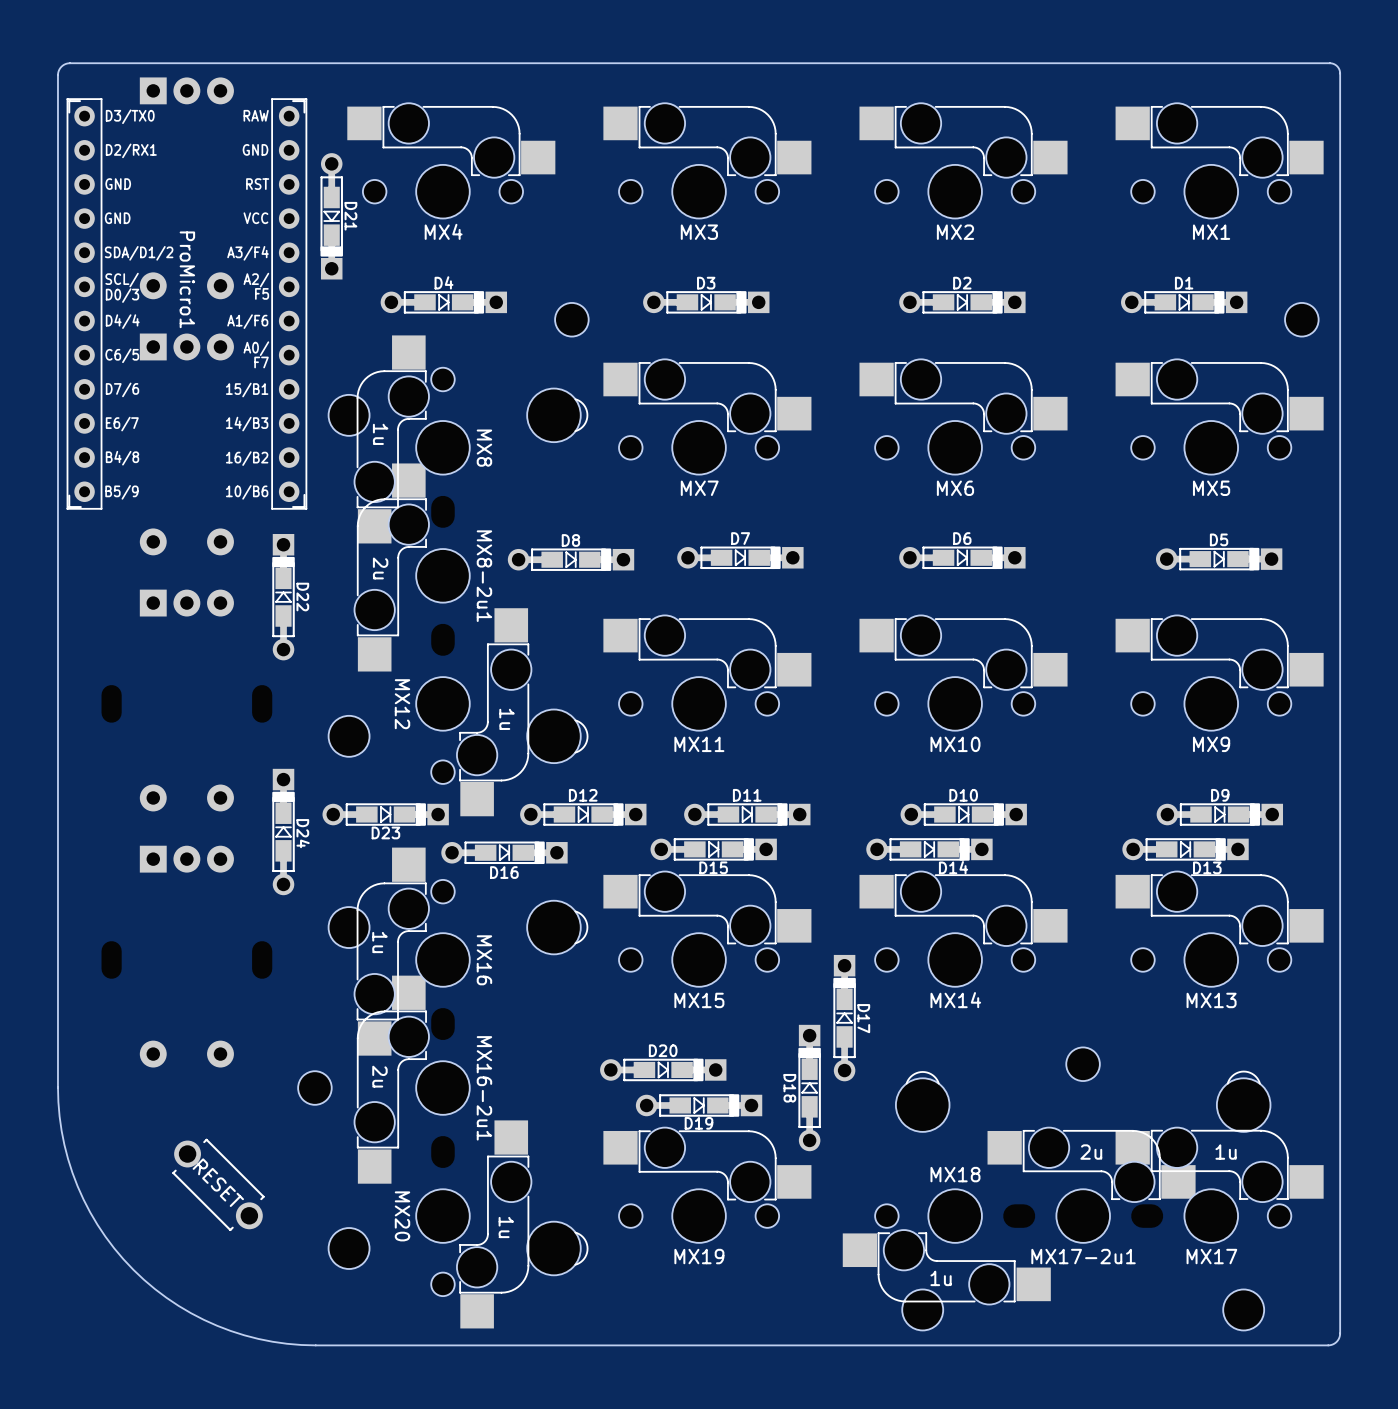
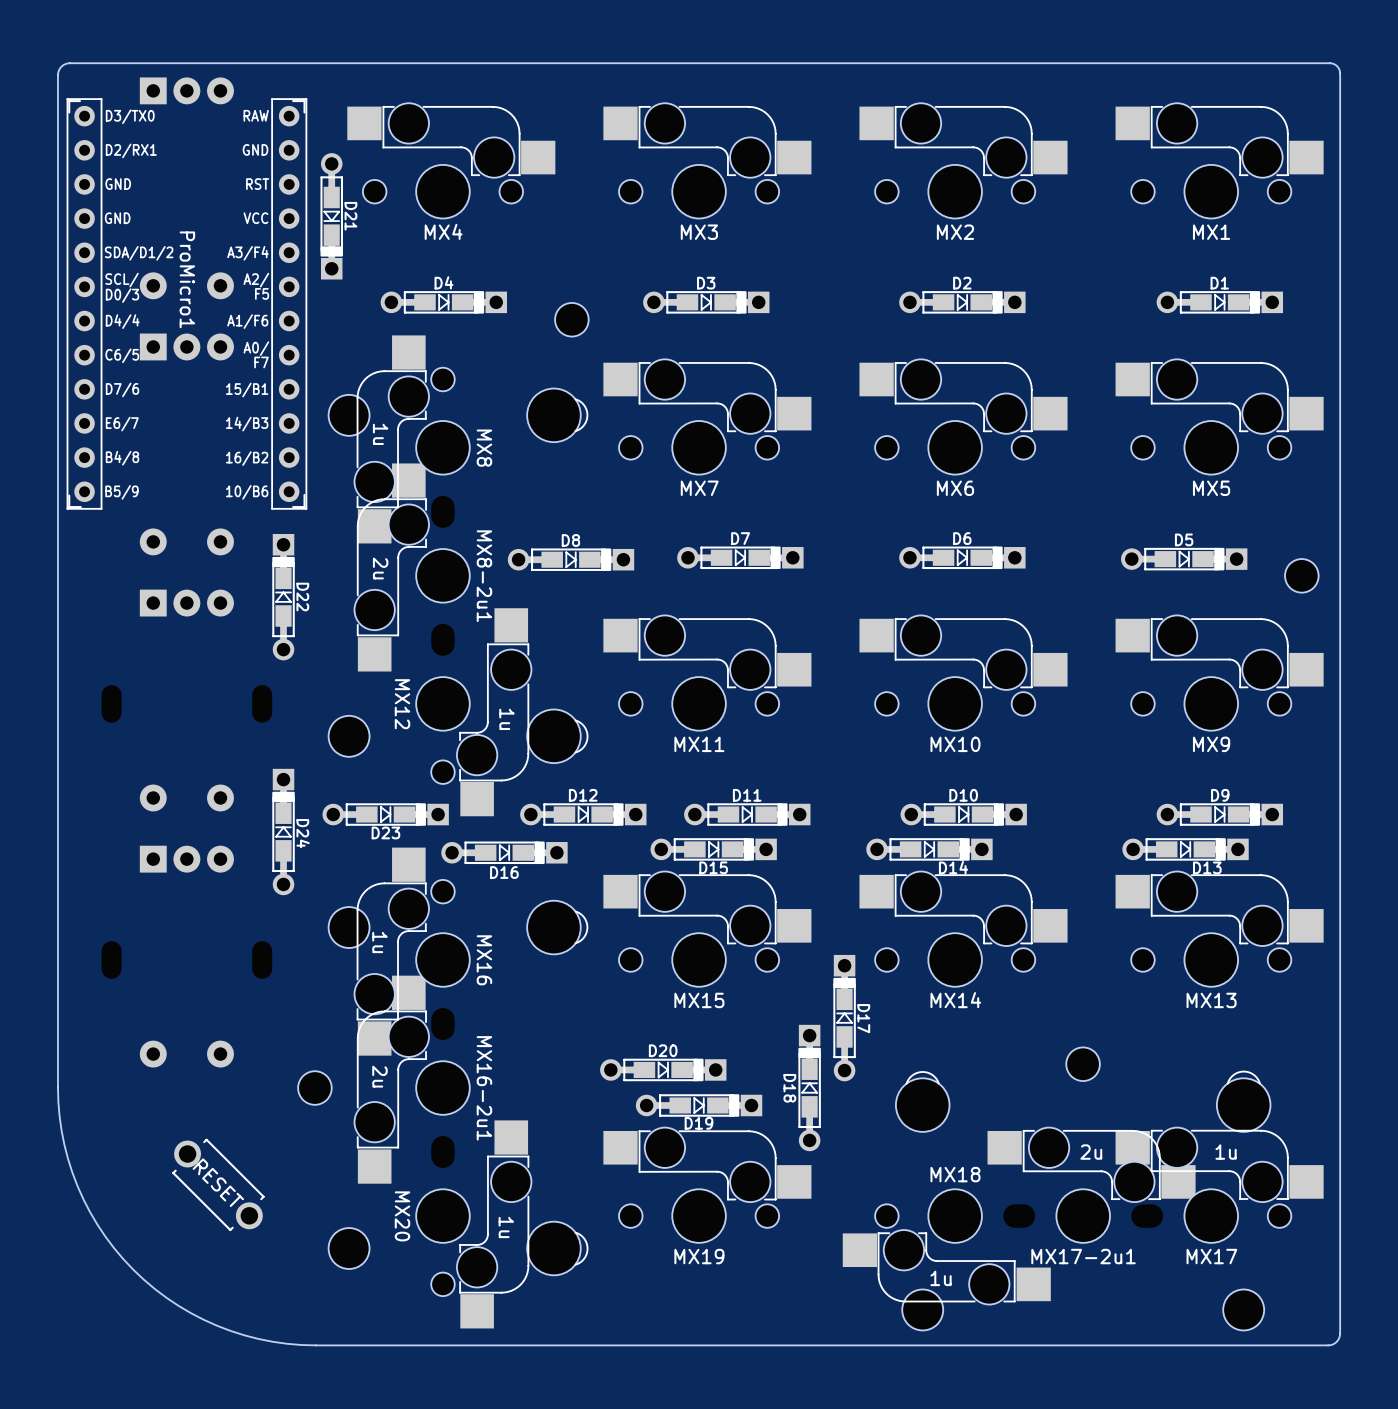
D1 position: (1184, 302) -> (1219, 302)
part position: (1301, 319) -> (1301, 575)
D5 position: (1219, 559) -> (1184, 559)

